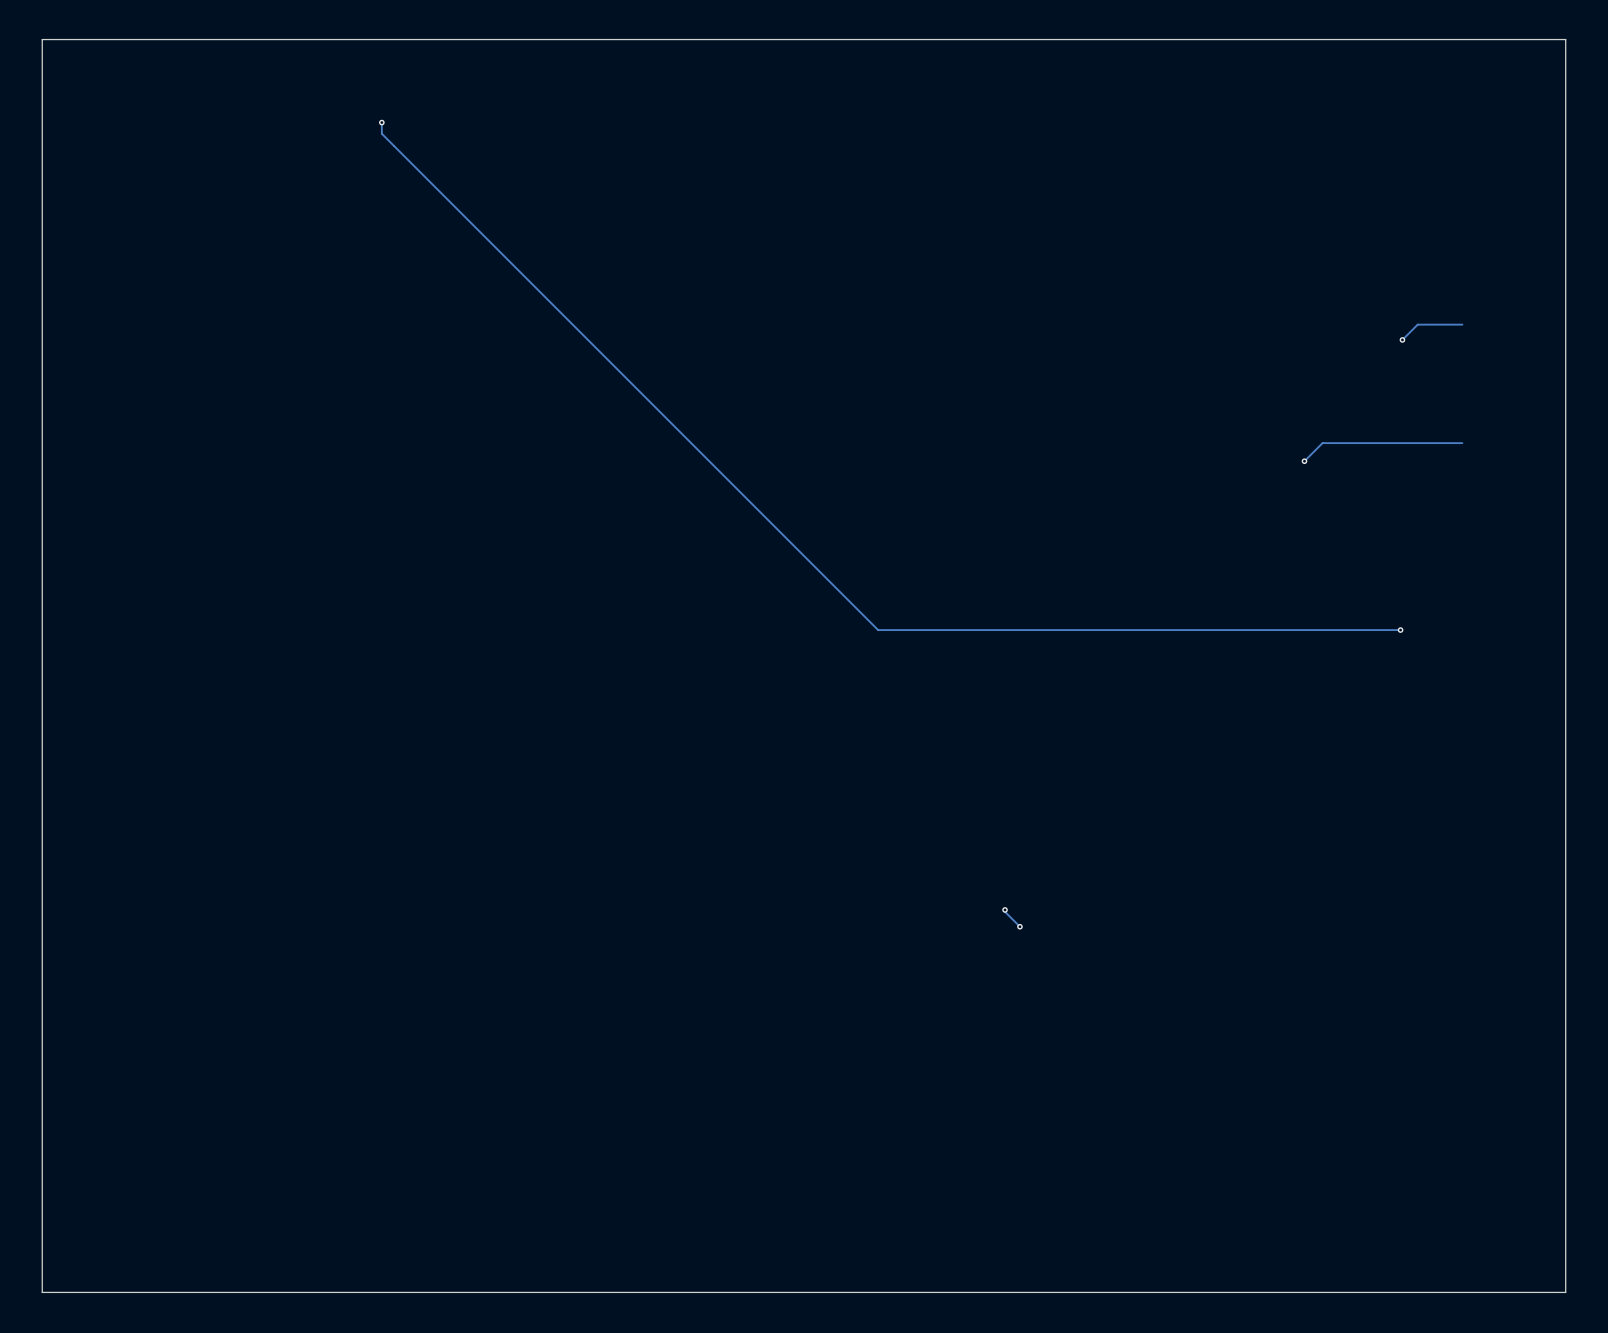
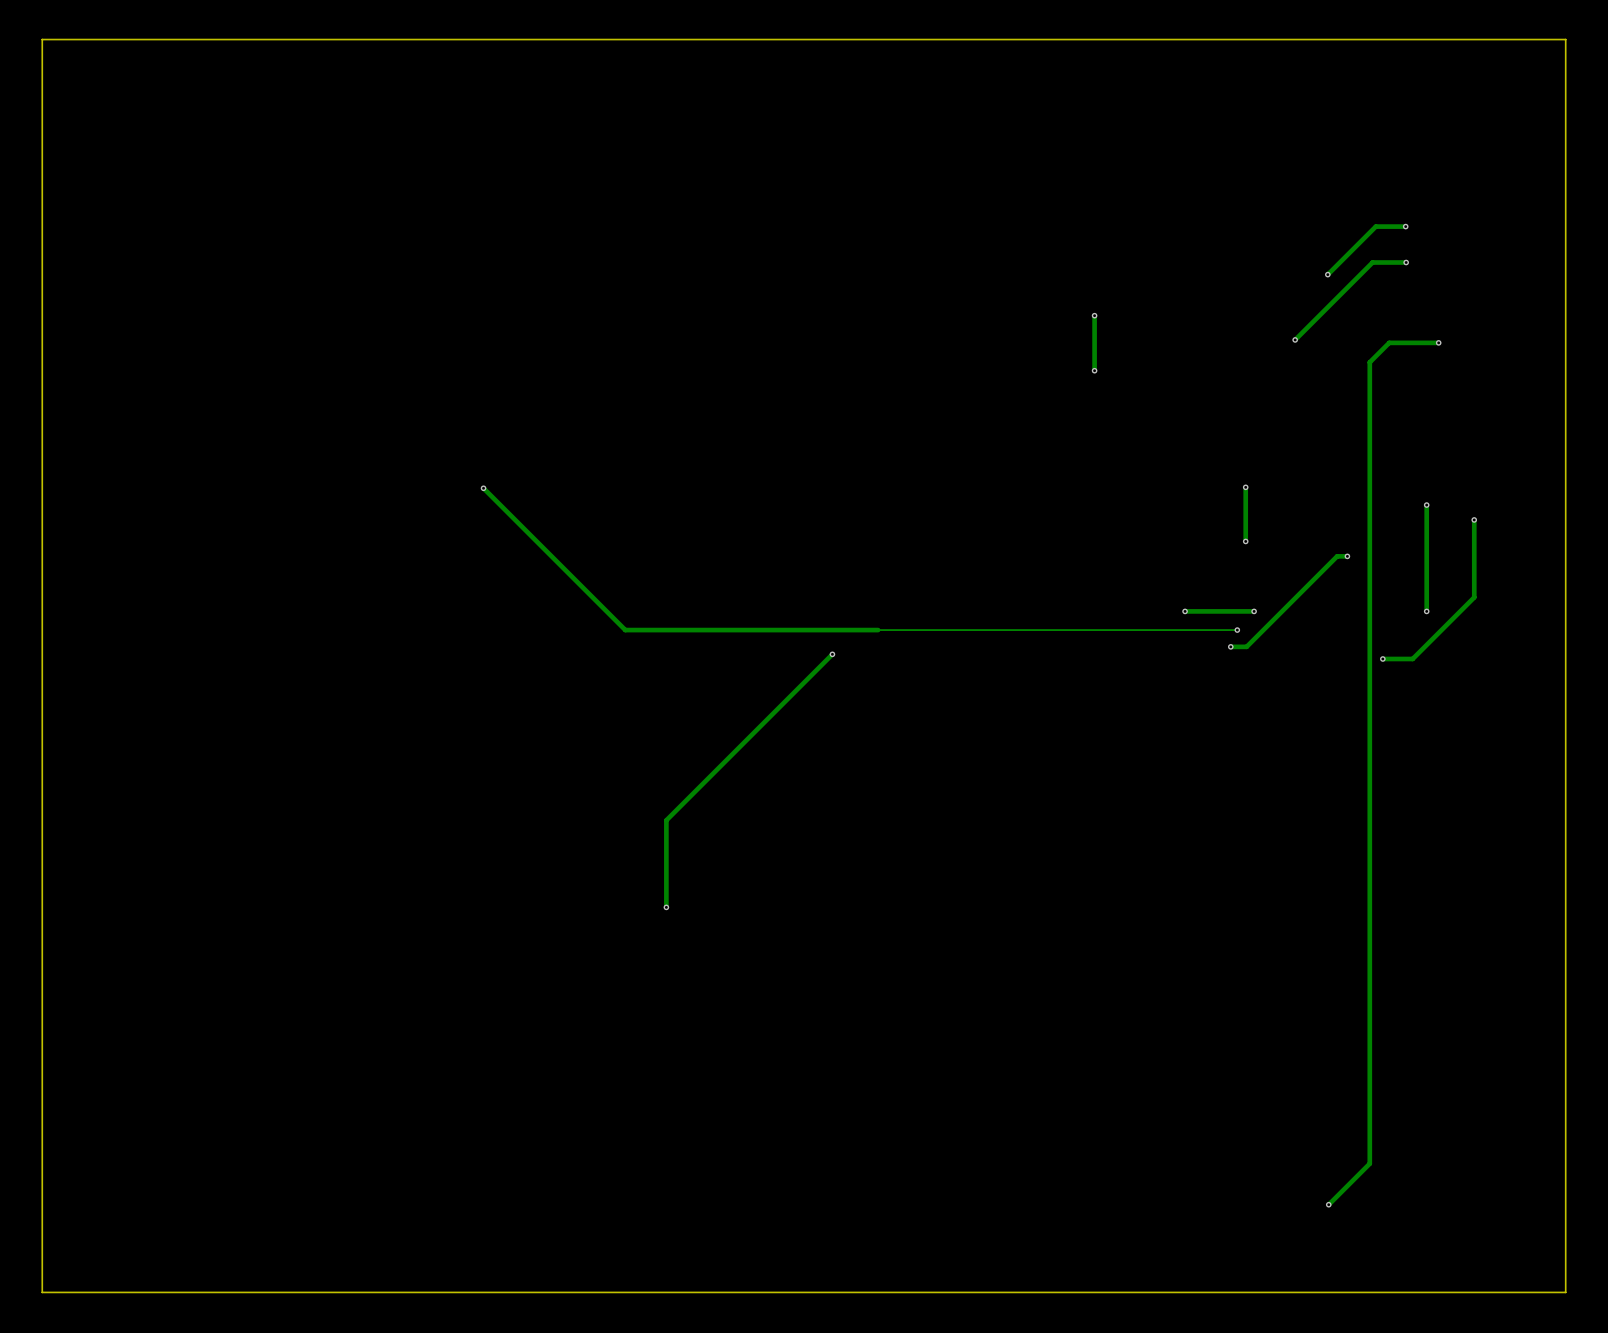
track: (381, 122) (381, 133) (878, 630) -> (483, 488) (625, 630) (878, 630)
via: (381, 122) -> none
track: none -> (1405, 226) (1375, 226) (1327, 274)
via: none -> (1405, 226)
track: none -> (1406, 262) (1372, 262) (1295, 339)
via: none -> (1406, 262)
via: none -> (1327, 274)
track: none -> (1094, 315) (1094, 370)
via: none -> (1094, 315)
track: (1462, 324) (1417, 324) (1402, 339) -> none
via: none -> (1295, 339)
via position: (1402, 339) -> (1438, 342)
track: none -> (1438, 342) (1389, 342) (1369, 362) (1369, 1163) (1328, 1204)
via: none -> (1094, 370)
track: (1462, 443) (1322, 443) (1304, 461) -> none
via: (1304, 461) -> none
track: none -> (1245, 487) (1245, 541)
via: none -> (1245, 487)
via: none -> (483, 488)
track: none -> (1426, 505) (1426, 611)
via: none -> (1426, 505)
track: none -> (1474, 519) (1474, 597) (1412, 658) (1382, 658)
via: none -> (1474, 519)
via: none -> (1245, 541)
track: none -> (1347, 556) (1337, 556) (1246, 646) (1230, 646)
via: none -> (1347, 556)
via: none -> (1185, 611)
track: none -> (1254, 611) (1185, 611)
via: none -> (1254, 611)
via: none -> (1426, 611)
via: none -> (1237, 630)
track: (1400, 630) (1237, 630) -> none
via: (1400, 630) -> none
via: none -> (1230, 646)
track: none -> (832, 654) (666, 820) (666, 907)
via: none -> (832, 654)
via: none -> (1382, 658)
via: none -> (666, 907)
track: (1005, 909) (1019, 926) -> none
via: (1005, 909) -> none
via: (1019, 926) -> none
via: none -> (1328, 1204)

